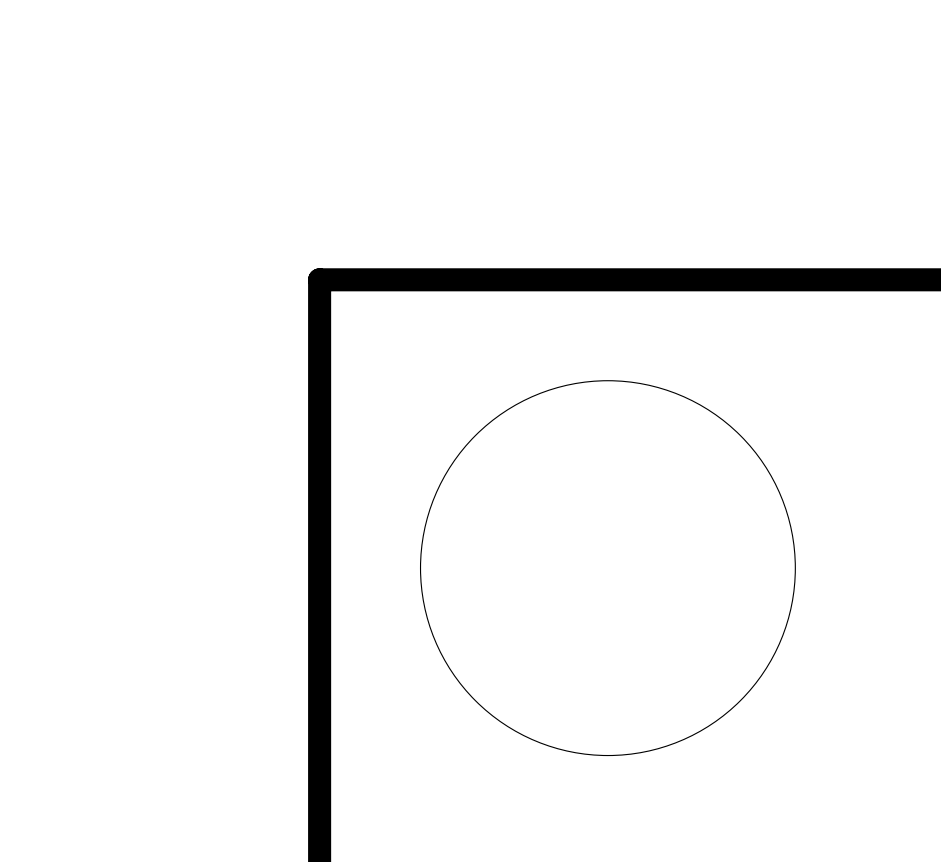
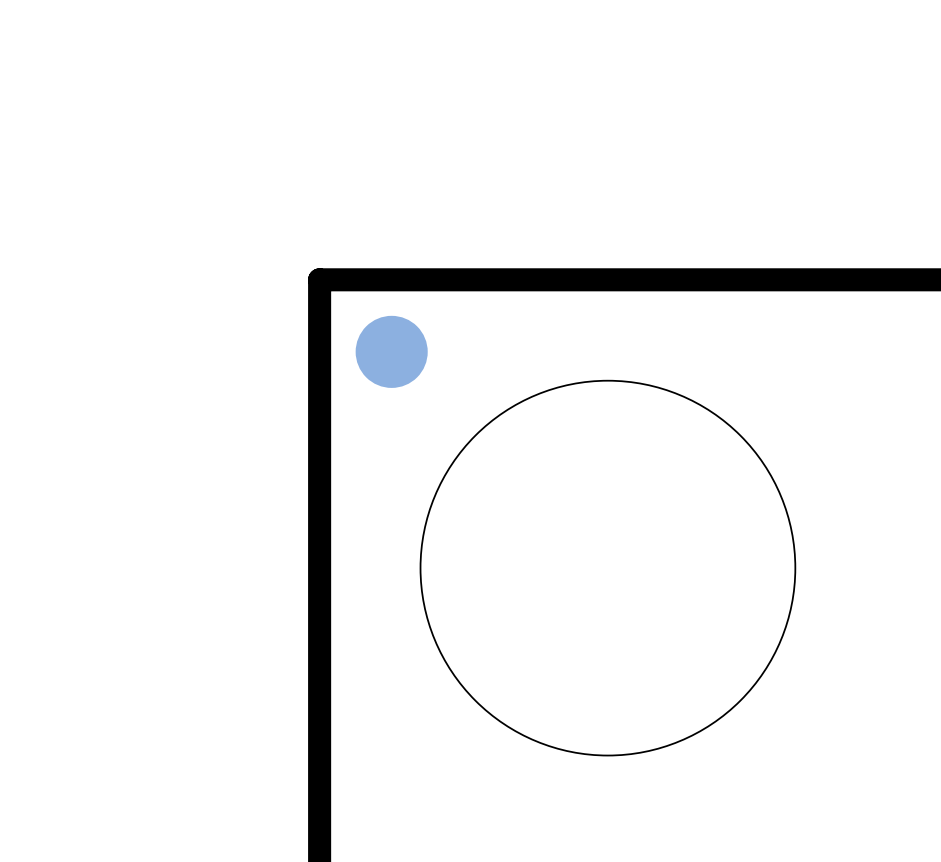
part: none -> (391, 351)

